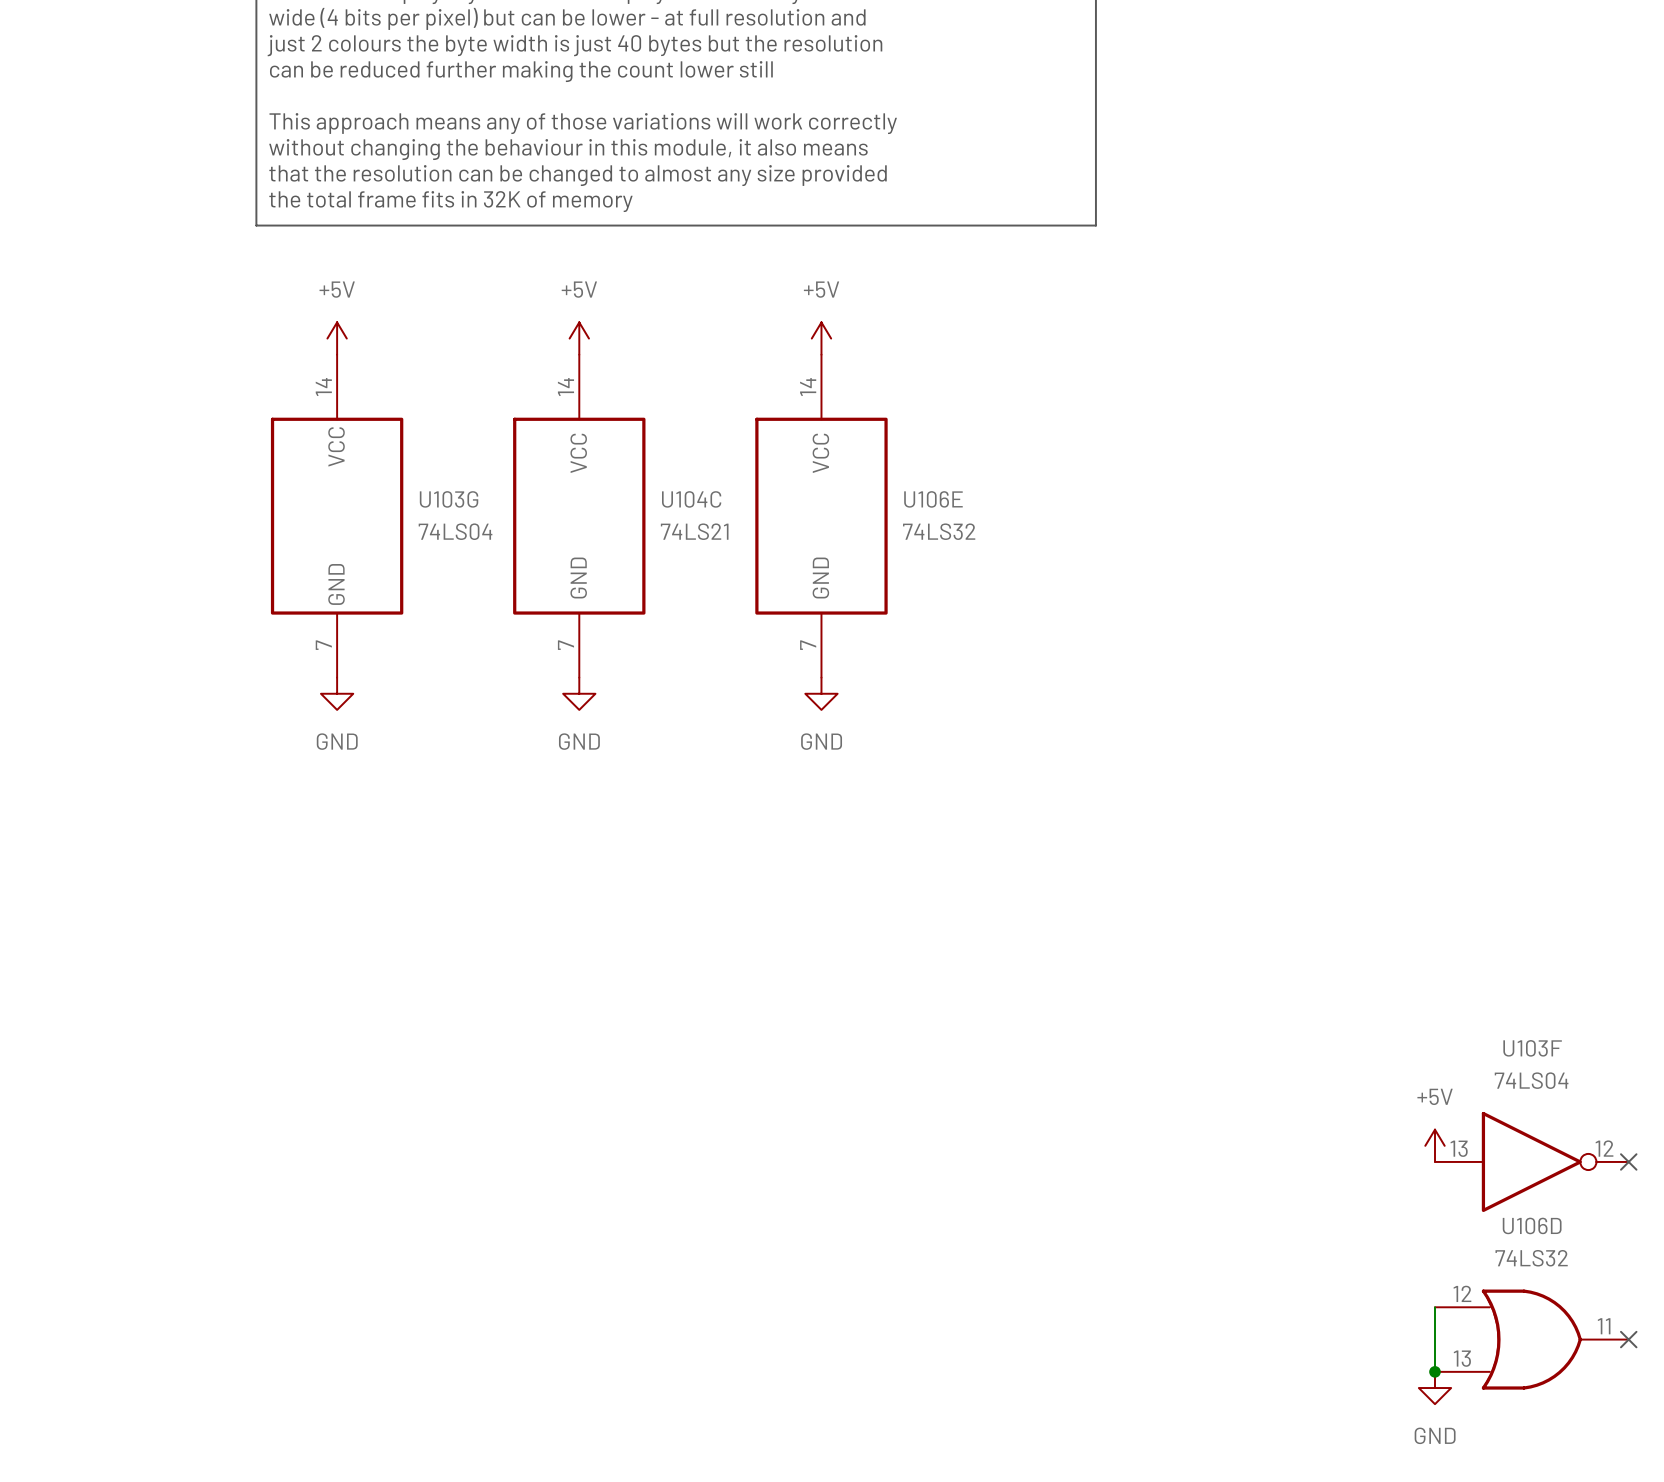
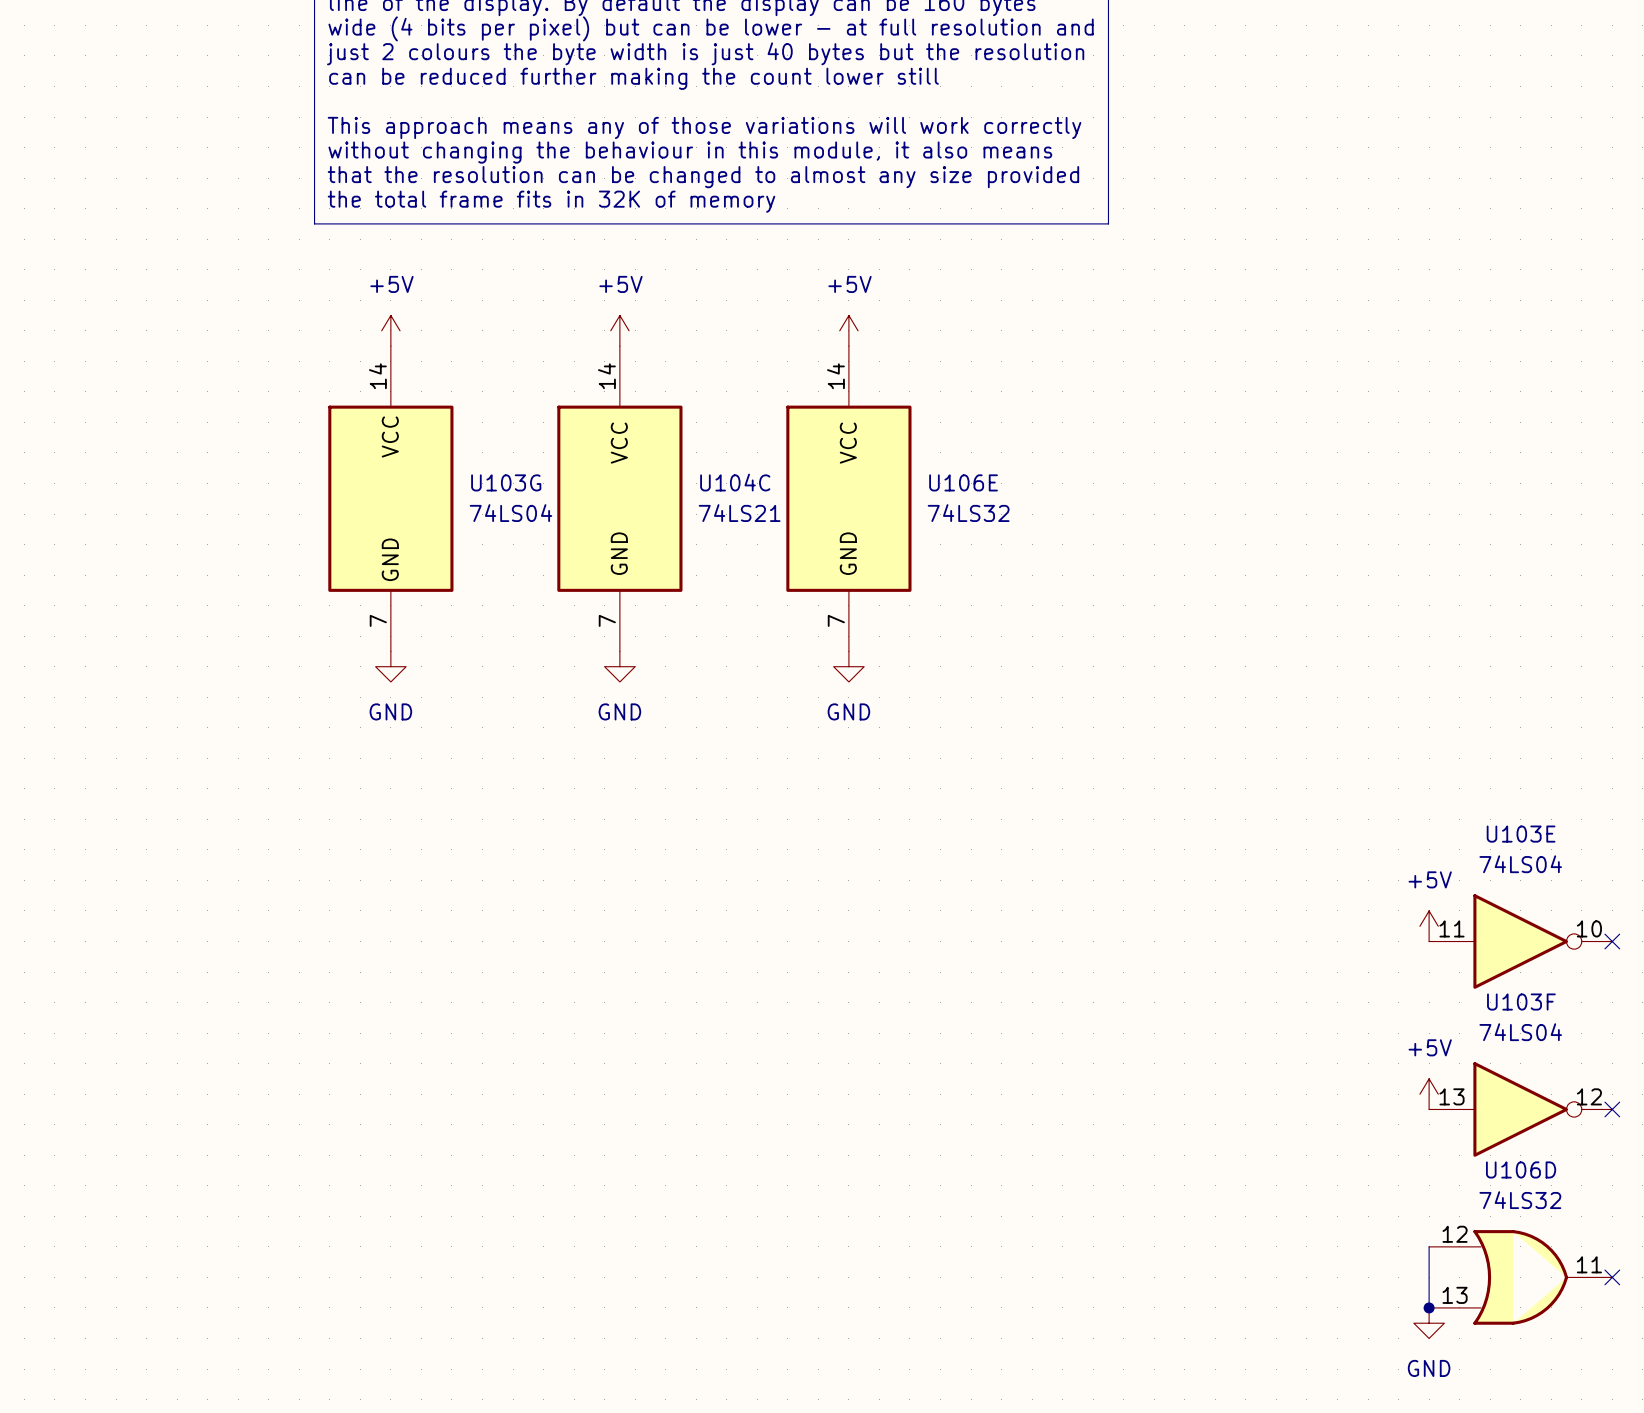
power symbol: none -> +5V (1429, 926)
U103E: none -> 74LS04 (1520, 941)
no-connect mark: none -> (1612, 941)

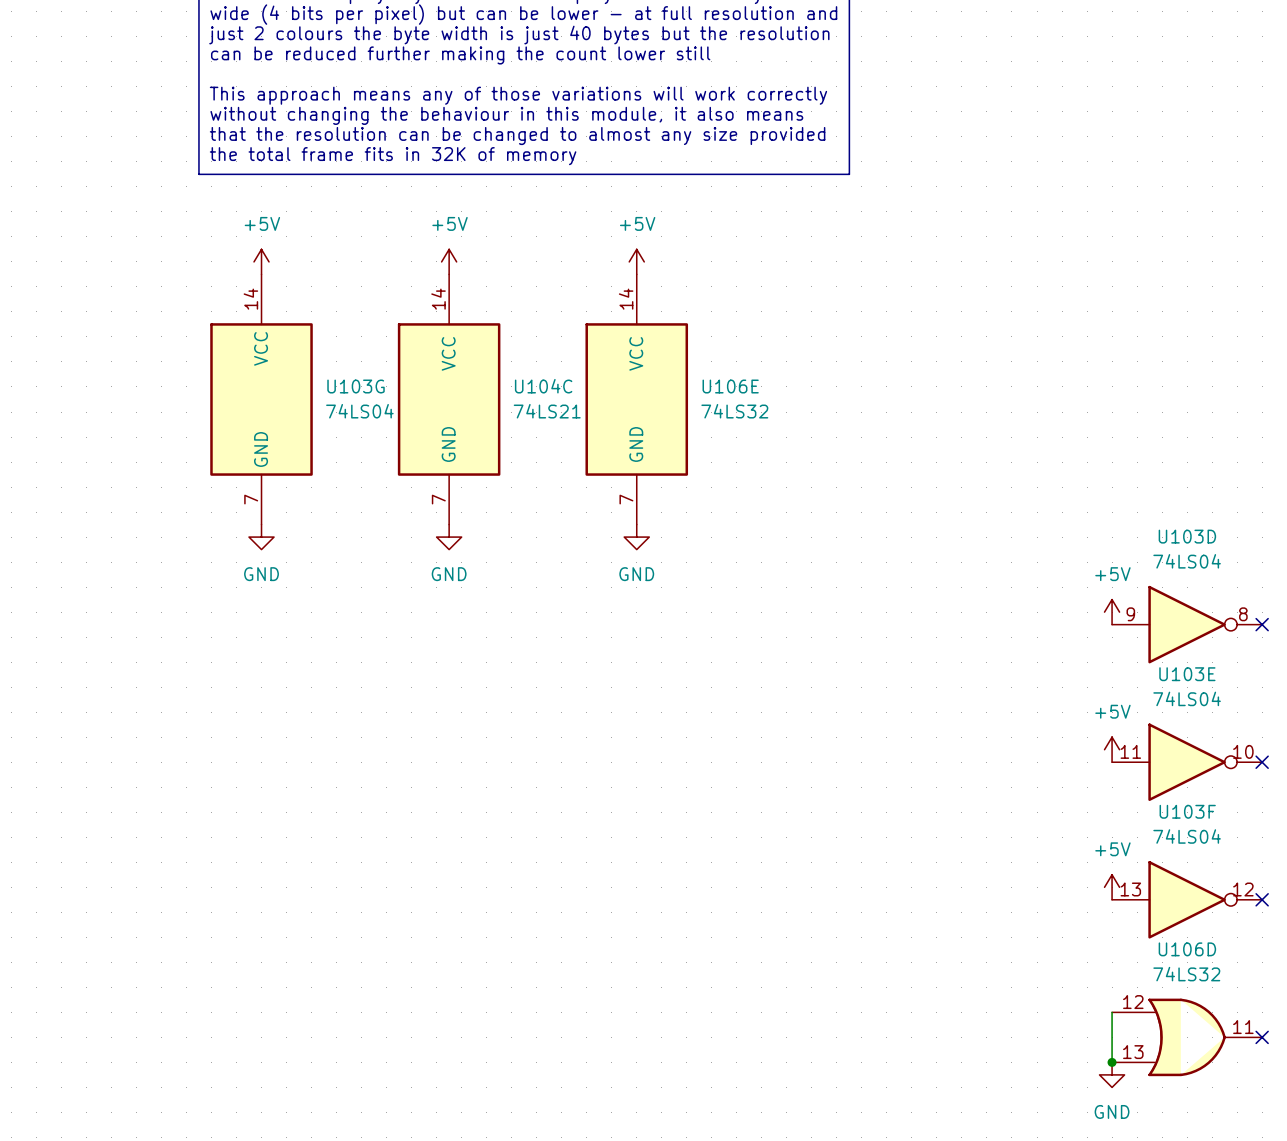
power symbol: none -> +5V (1112, 612)
U103D: none -> 74LS04 (1187, 624)
no-connect mark: none -> (1262, 624)

